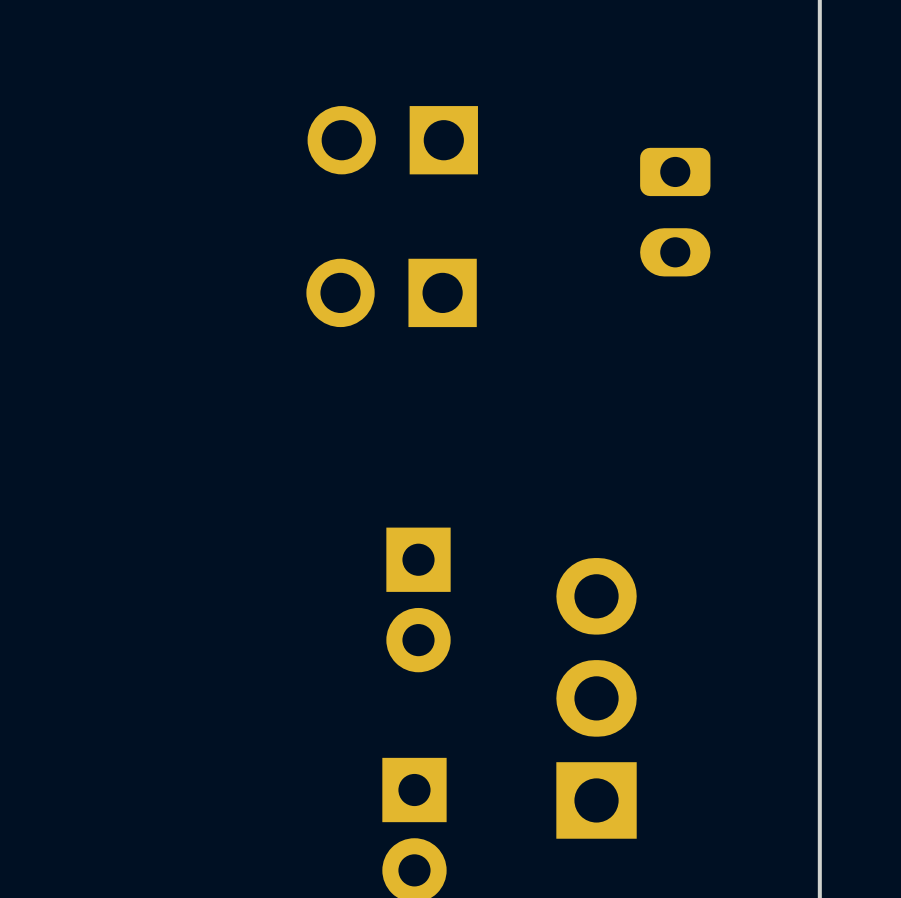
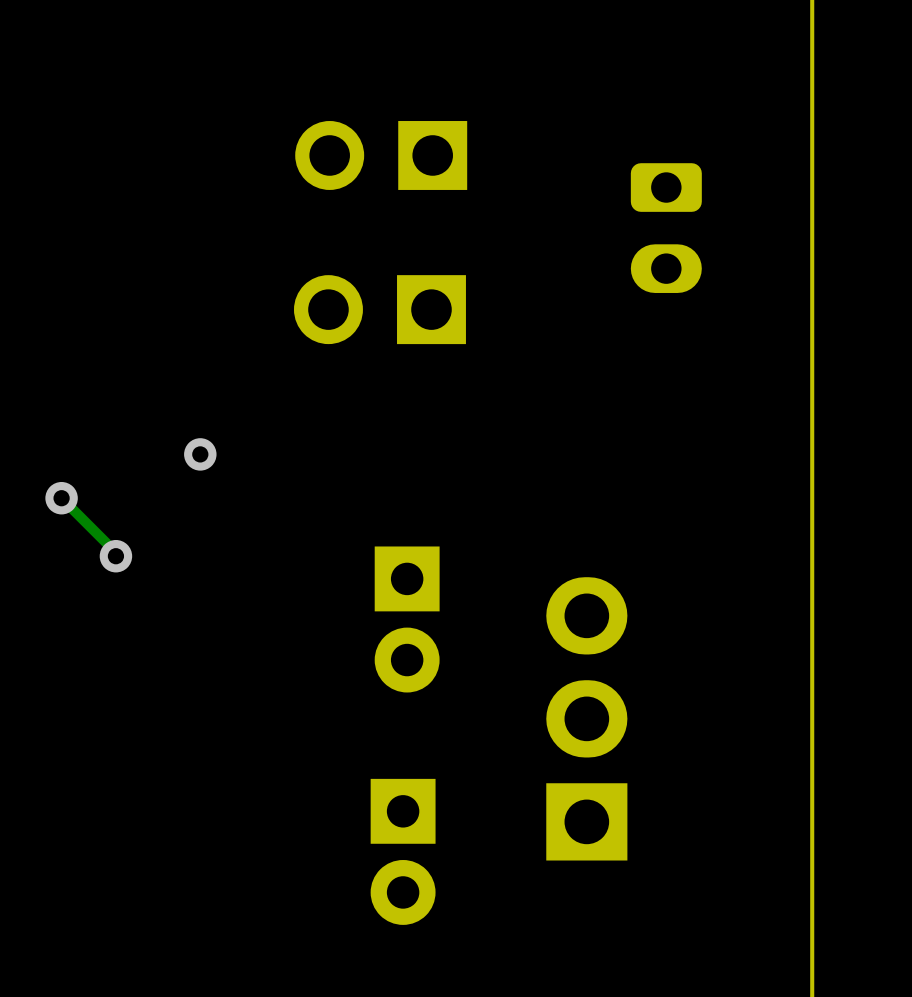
via: none -> (200, 454)
track: none -> (61, 498) (115, 552) (115, 556)
via: none -> (61, 498)
via: none -> (115, 556)

